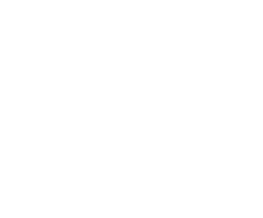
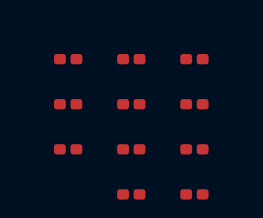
part: none -> (68, 59)
part: none -> (131, 59)
part: none -> (194, 59)
part: none -> (68, 104)
part: none -> (131, 104)
part: none -> (194, 104)
part: none -> (68, 149)
part: none -> (131, 149)
part: none -> (194, 149)
part: none -> (131, 194)
part: none -> (194, 194)

